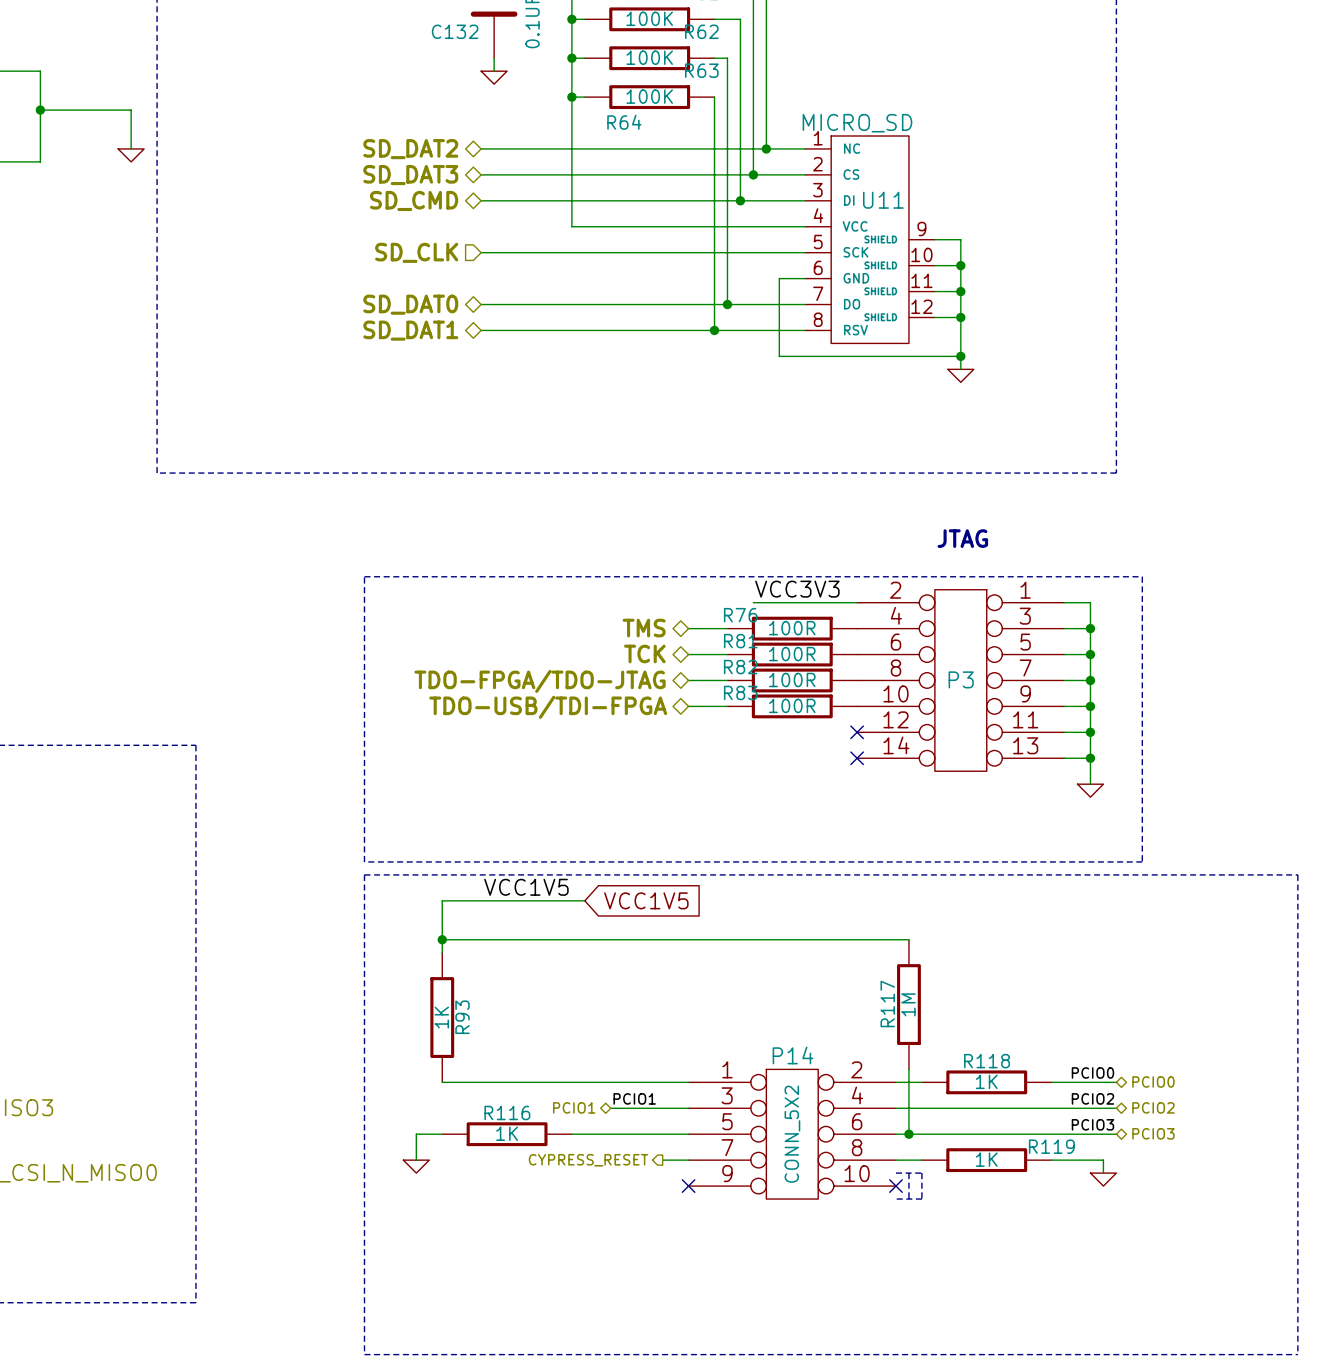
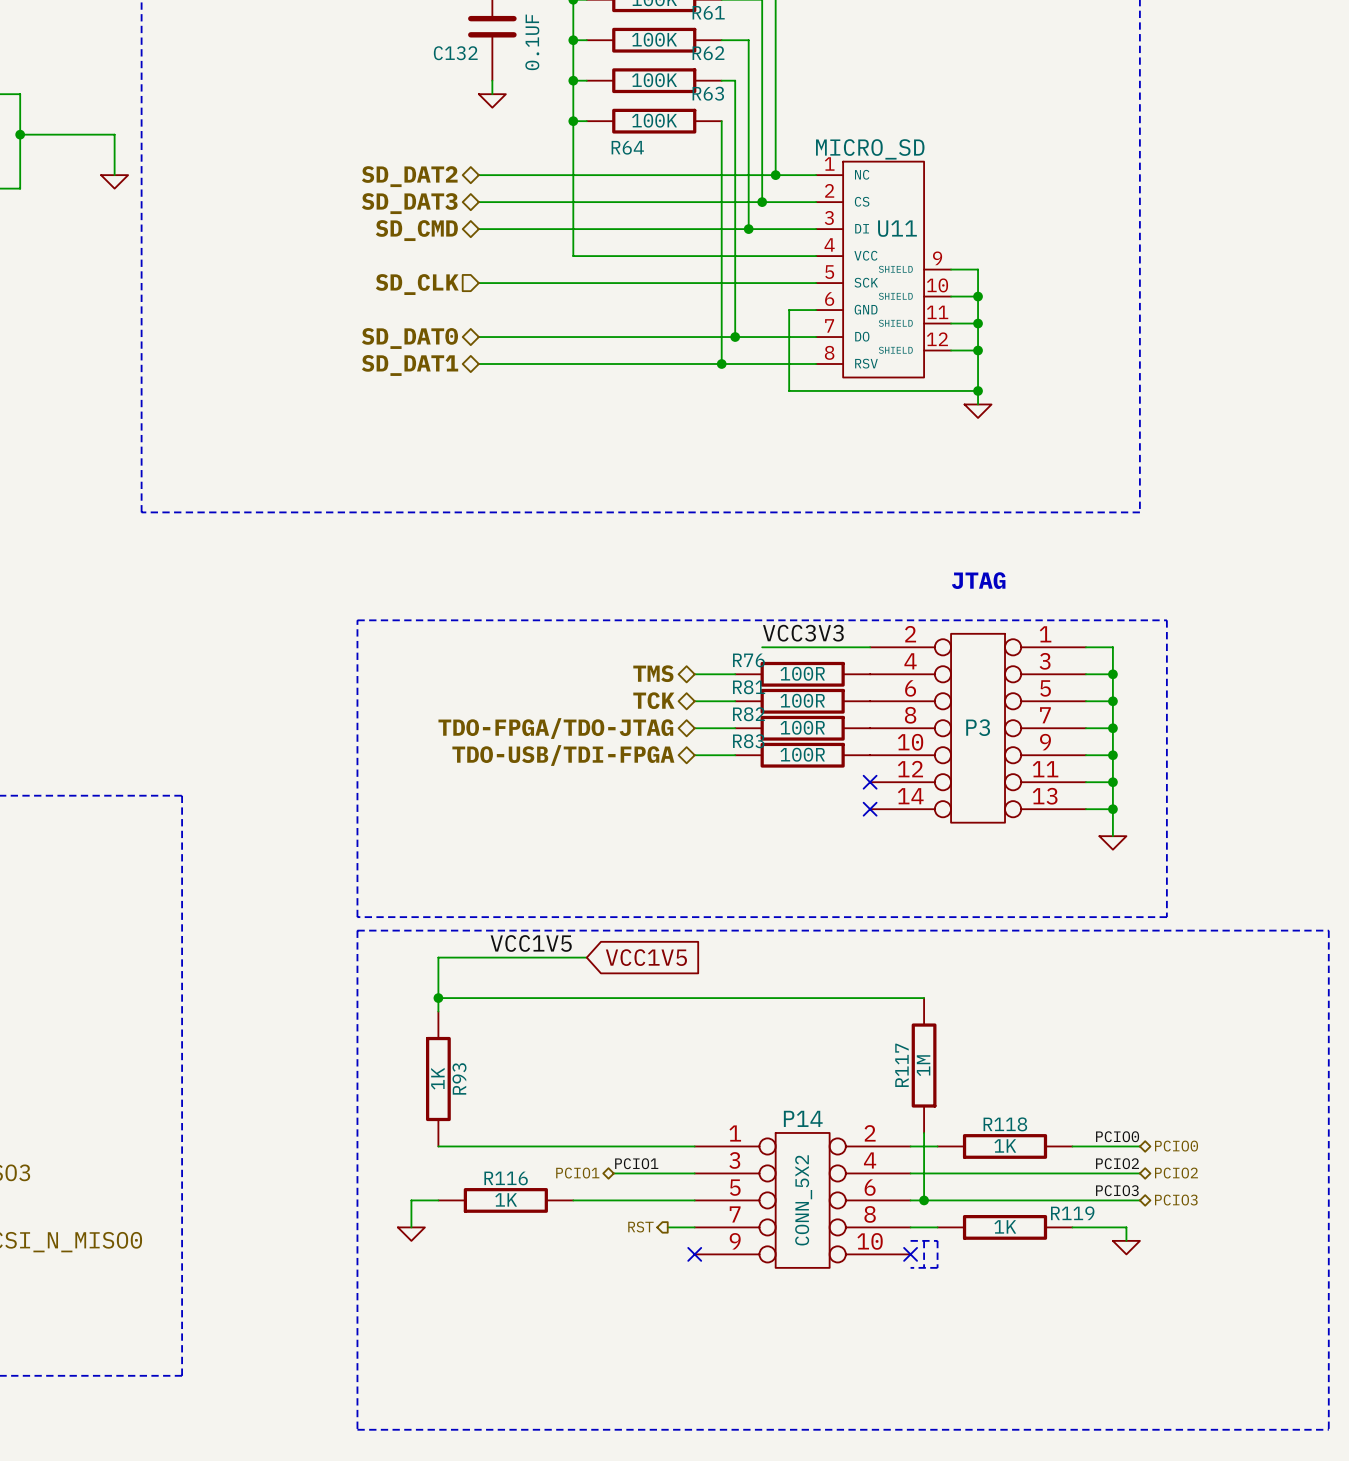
hierarchical label: CYPRESS_RESET (588, 1160) -> RST (640, 1227)

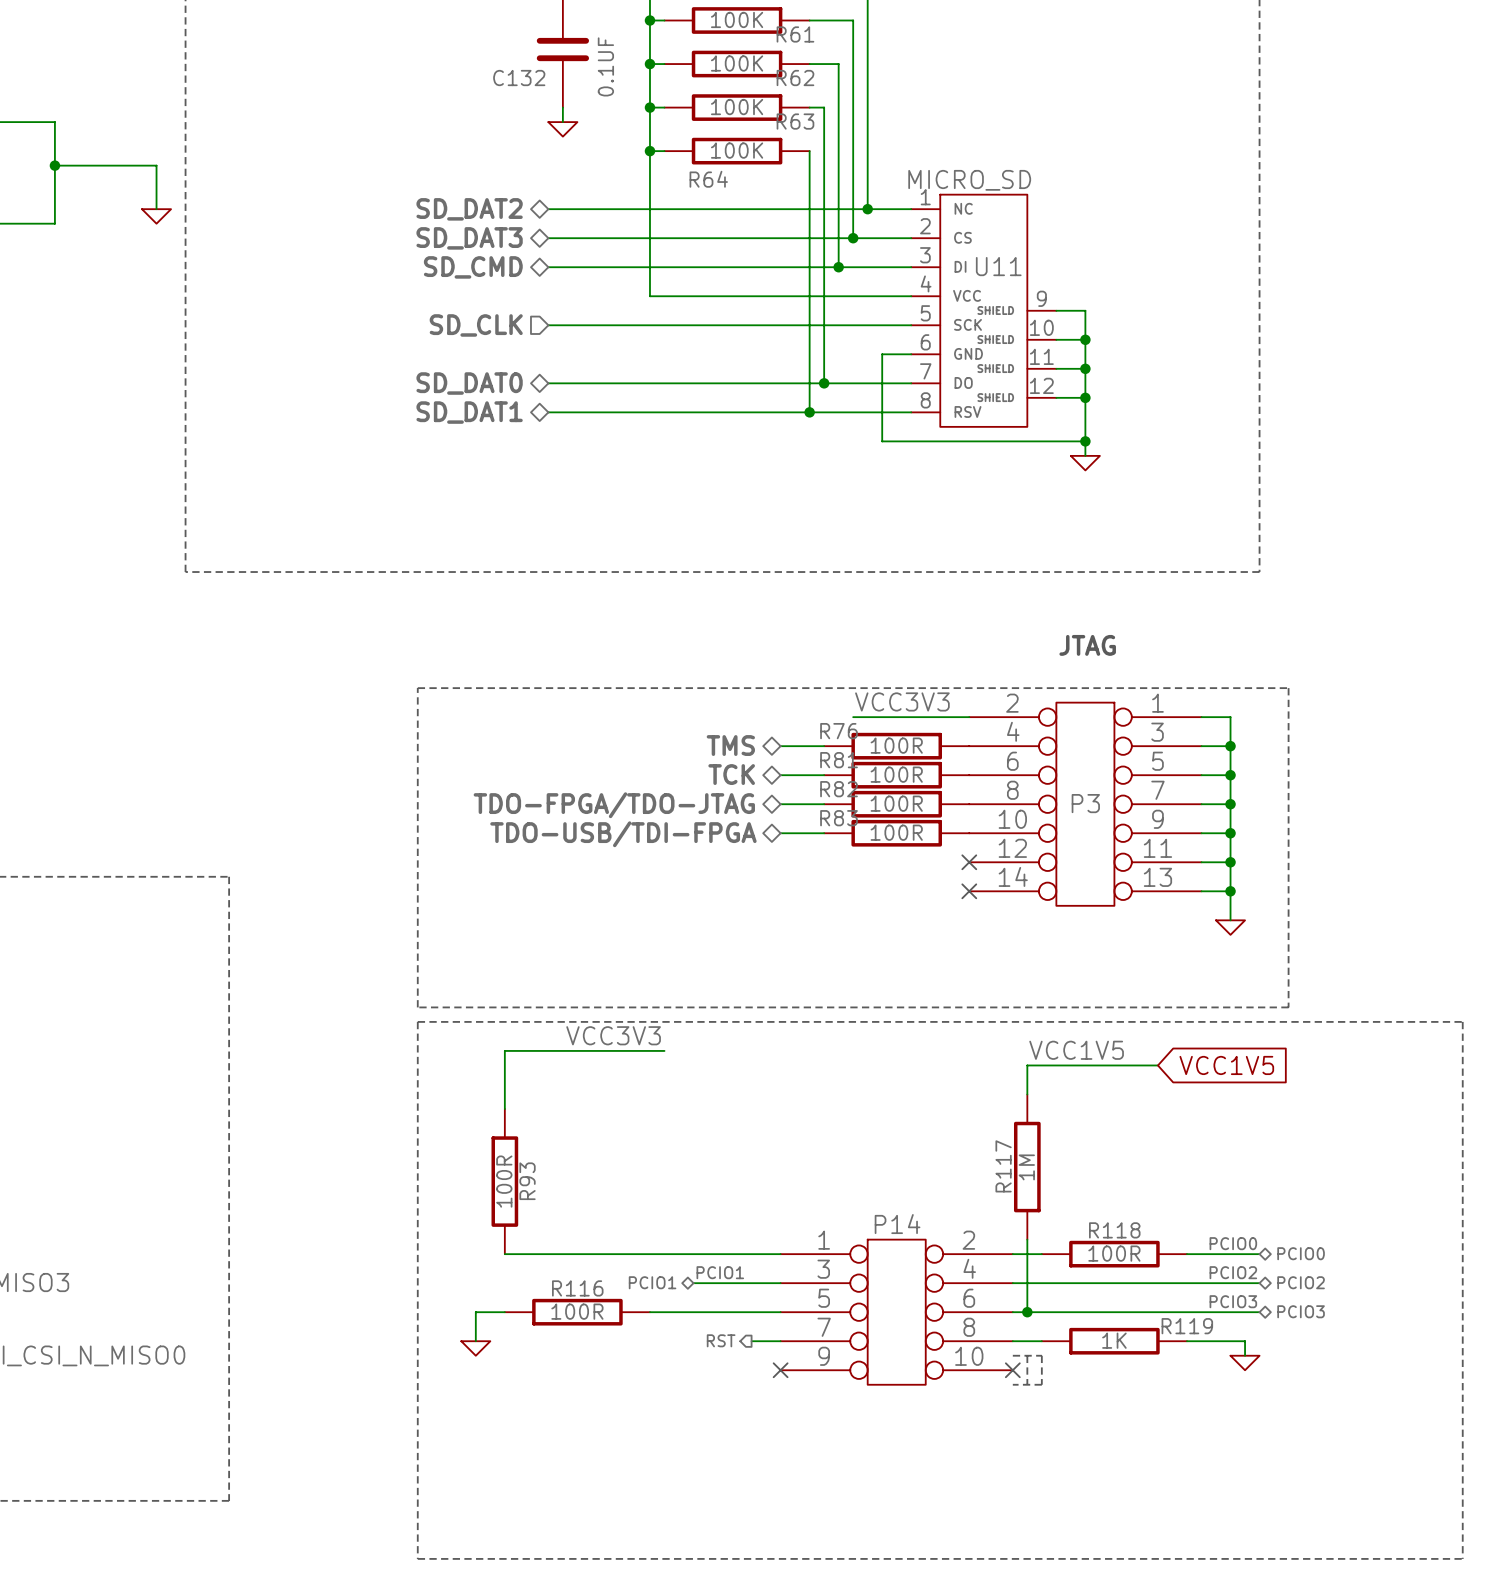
label: VCC1V5 (531, 943) -> VCC3V3 (613, 1035)
label: none -> VCC1V5 (1076, 1050)
global label: VCC1V5 (646, 957) -> none
global label: none -> VCC1V5 (1226, 1065)
wire: (438, 998) (924, 998) -> (1157, 1065) (1027, 1065) (1027, 1094)
junction: (438, 998) -> none
R93 value: 1K (437, 1078) -> 100R (504, 1181)
R118 value: 1K (1005, 1145) -> 100R (1114, 1253)
R116 value: 1K (506, 1199) -> 100R (577, 1311)
P14 value: CONN_5X2 (803, 1200) -> none

